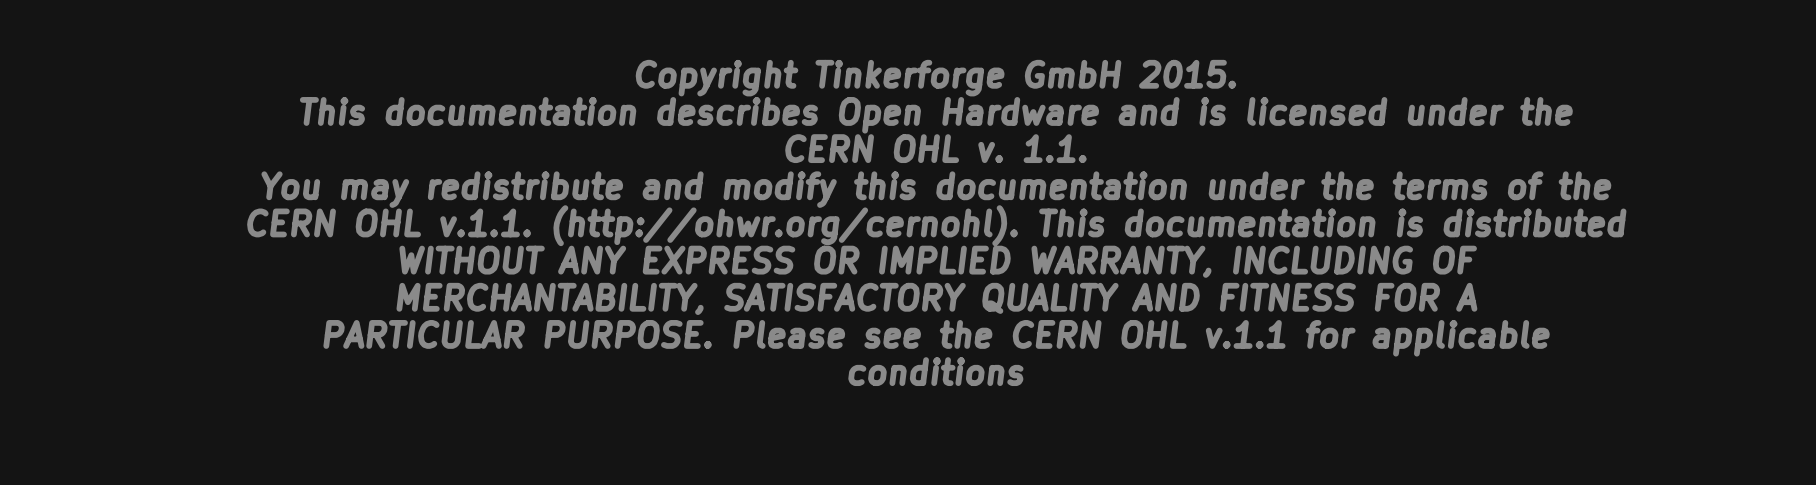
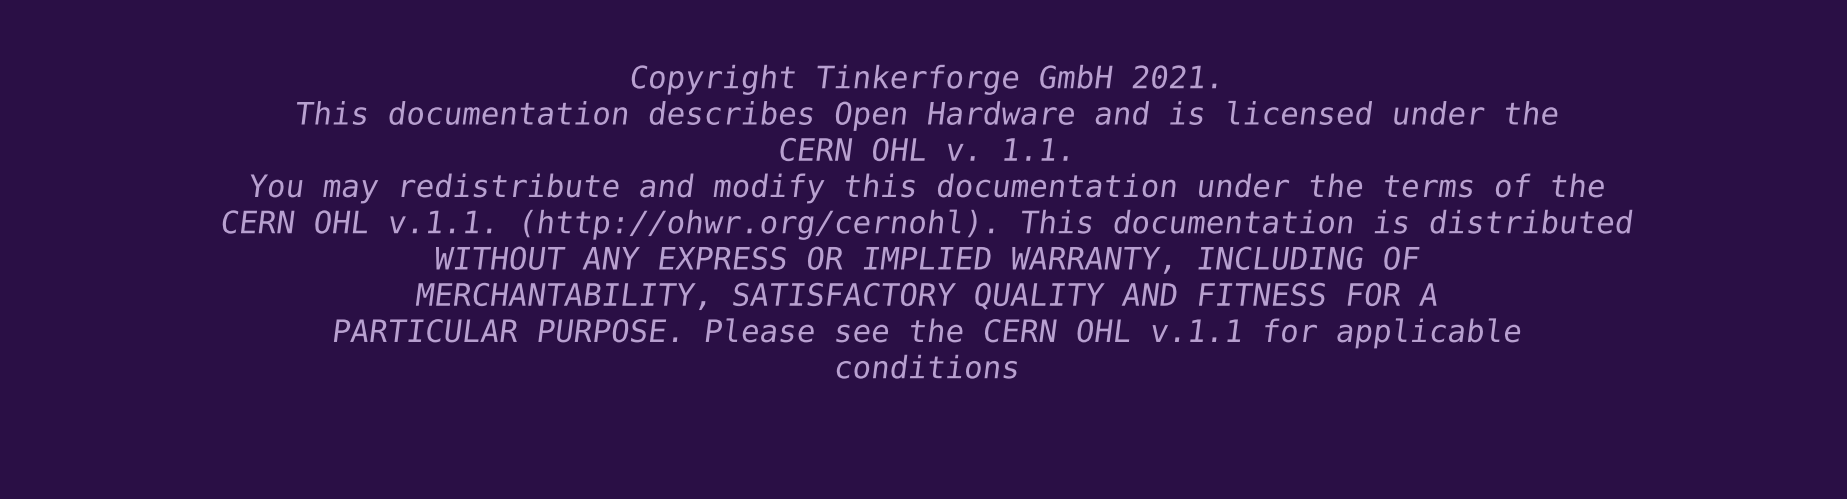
text: Copyright Tinkerforge GmbH 2015. (935, 78) -> Copyright Tinkerforge GmbH 2021. (923, 79)

